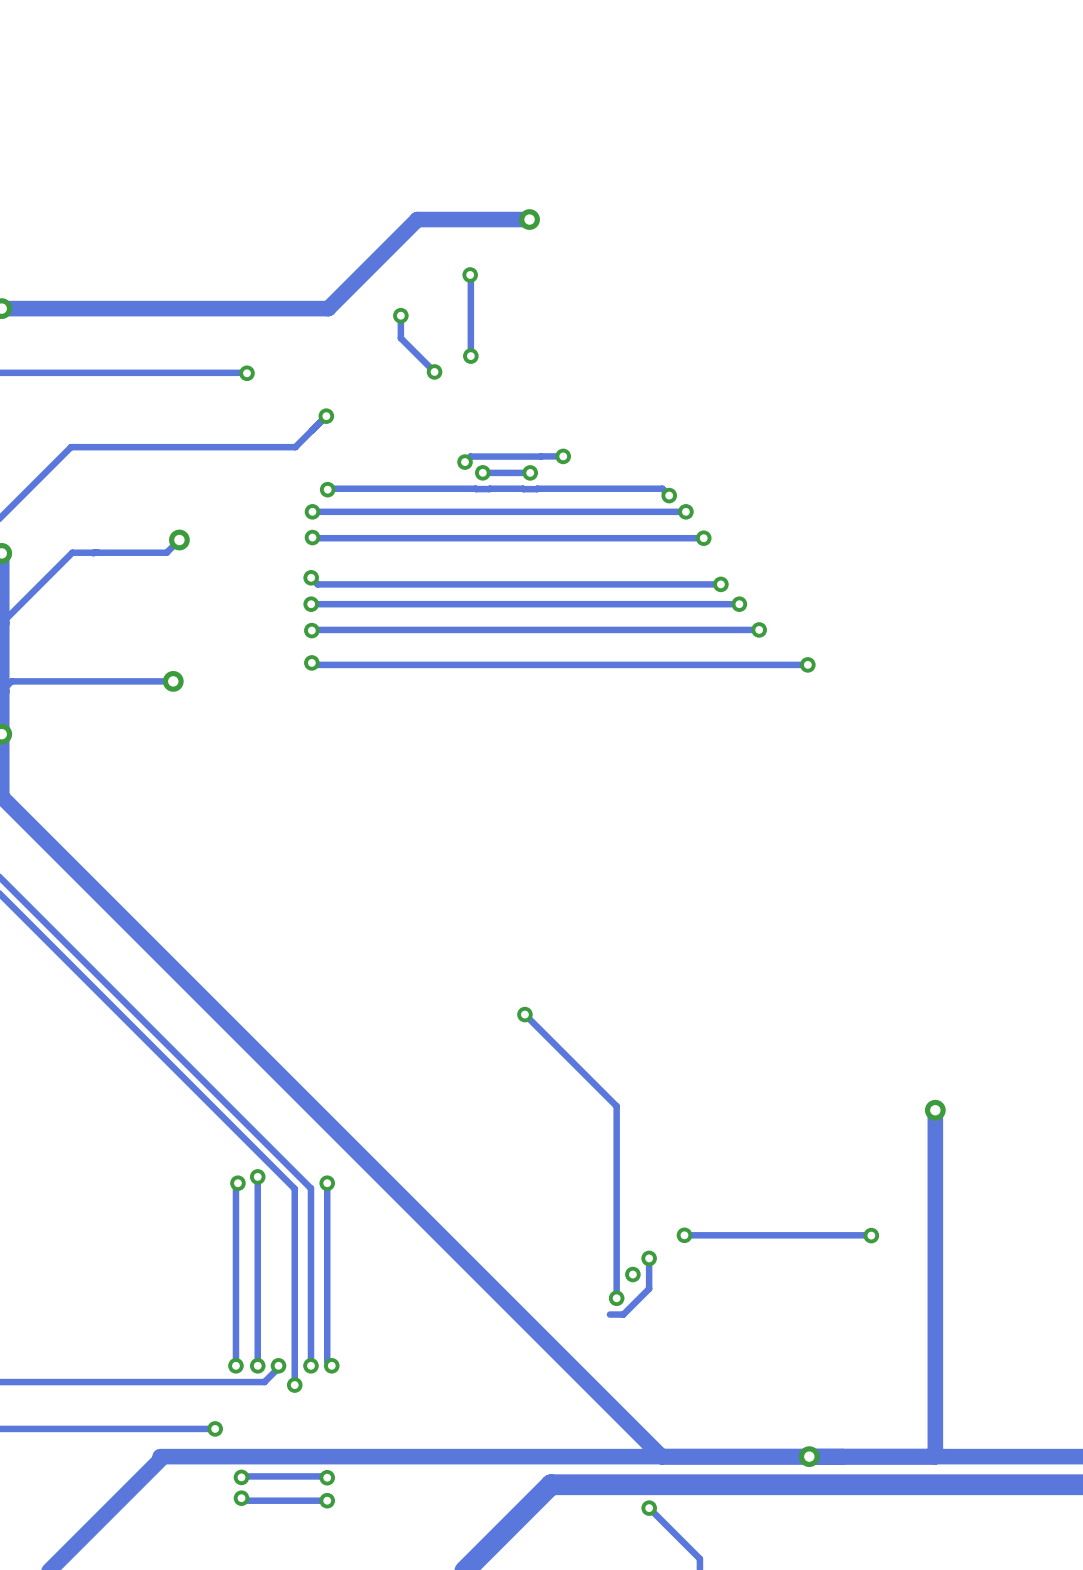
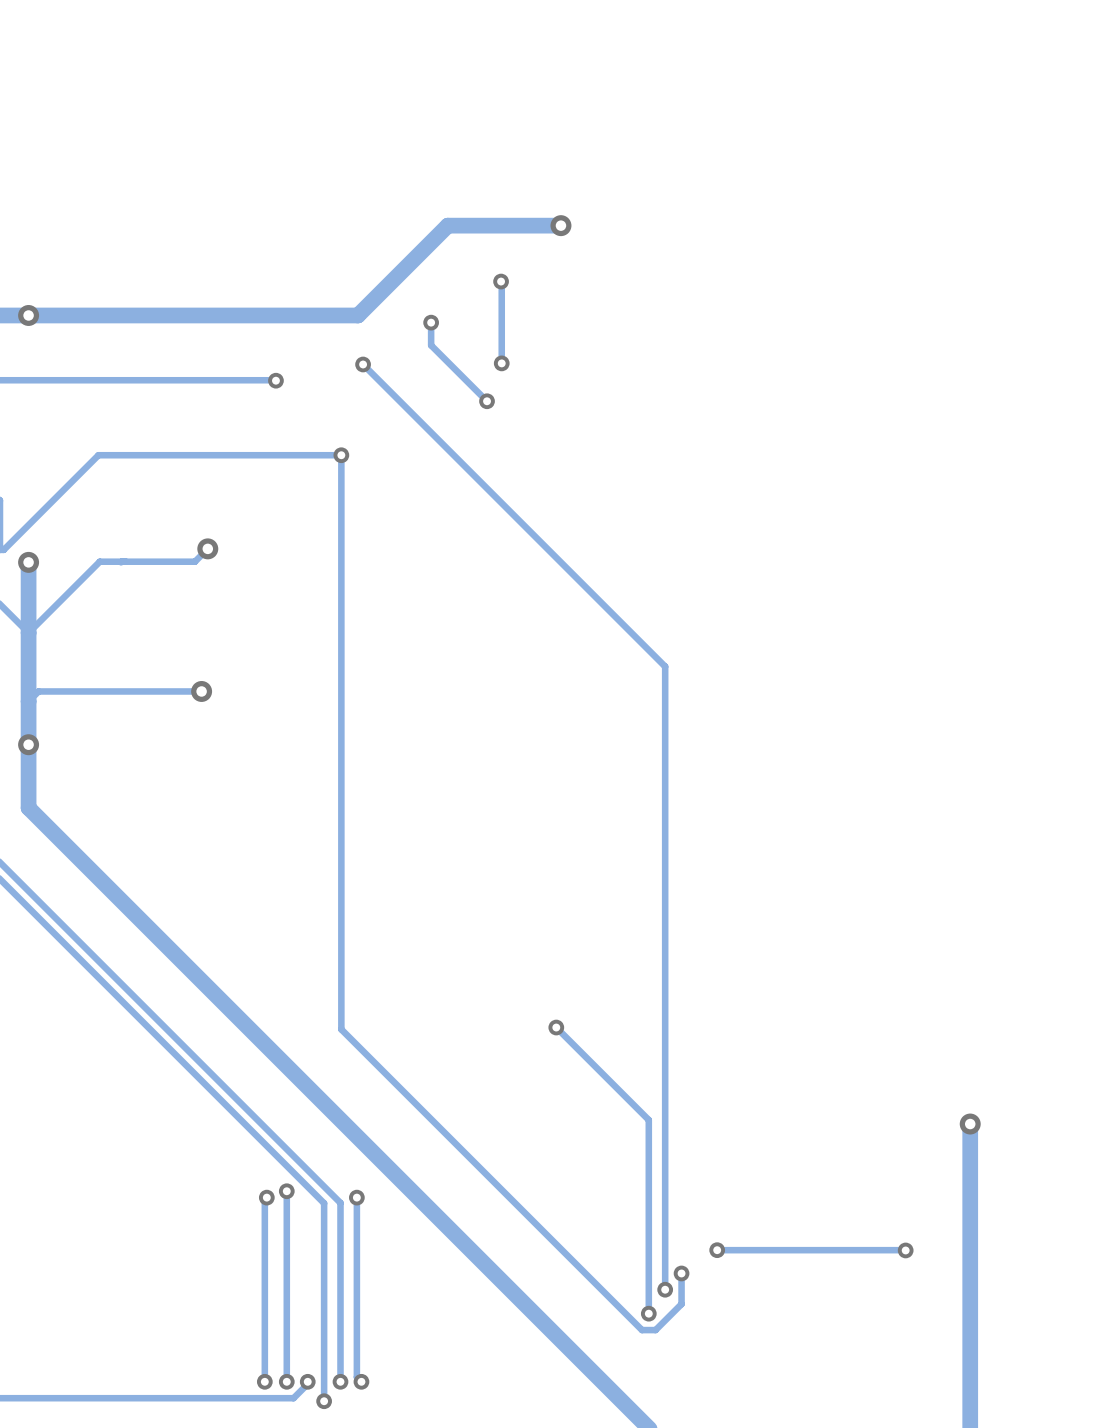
track: none -> (363, 364) (665, 666) (665, 1289)
via: none -> (363, 364)
track: none -> (465, 379) (487, 401)
via position: (434, 371) -> (487, 401)
track: (326, 416) (295, 447) -> (642, 1330) (341, 1029) (341, 455) (324, 455)
via: (326, 416) -> none
via: none -> (341, 455)
track: (540, 456) (470, 456) (465, 462) -> none
track: (563, 456) (541, 456) -> none
via: (563, 456) -> none
via: (465, 462) -> none
via: (482, 472) -> none
track: (530, 472) (482, 472) -> none
via: (530, 472) -> none
track: (475, 488) (327, 489) -> none
track: (489, 488) (662, 488) (669, 495) -> none
via: (327, 489) -> none
track: (489, 489) (476, 489) -> none
via: (669, 495) -> none
via: (312, 511) -> none
track: (685, 511) (312, 511) -> none
via: (685, 511) -> none
track: (312, 537) (703, 538) -> none
via: (312, 537) -> none
via: (703, 538) -> none
track: (311, 577) (317, 584) (720, 584) -> none
via: (311, 577) -> none
via: (720, 584) -> none
via: (311, 604) -> none
track: (739, 604) (311, 604) -> none
via: (739, 604) -> none
track: (759, 629) (311, 630) -> none
via: (759, 629) -> none
via: (311, 630) -> none
track: (311, 662) (313, 664) (807, 664) -> none
via: (311, 662) -> none
via: (807, 664) -> none

